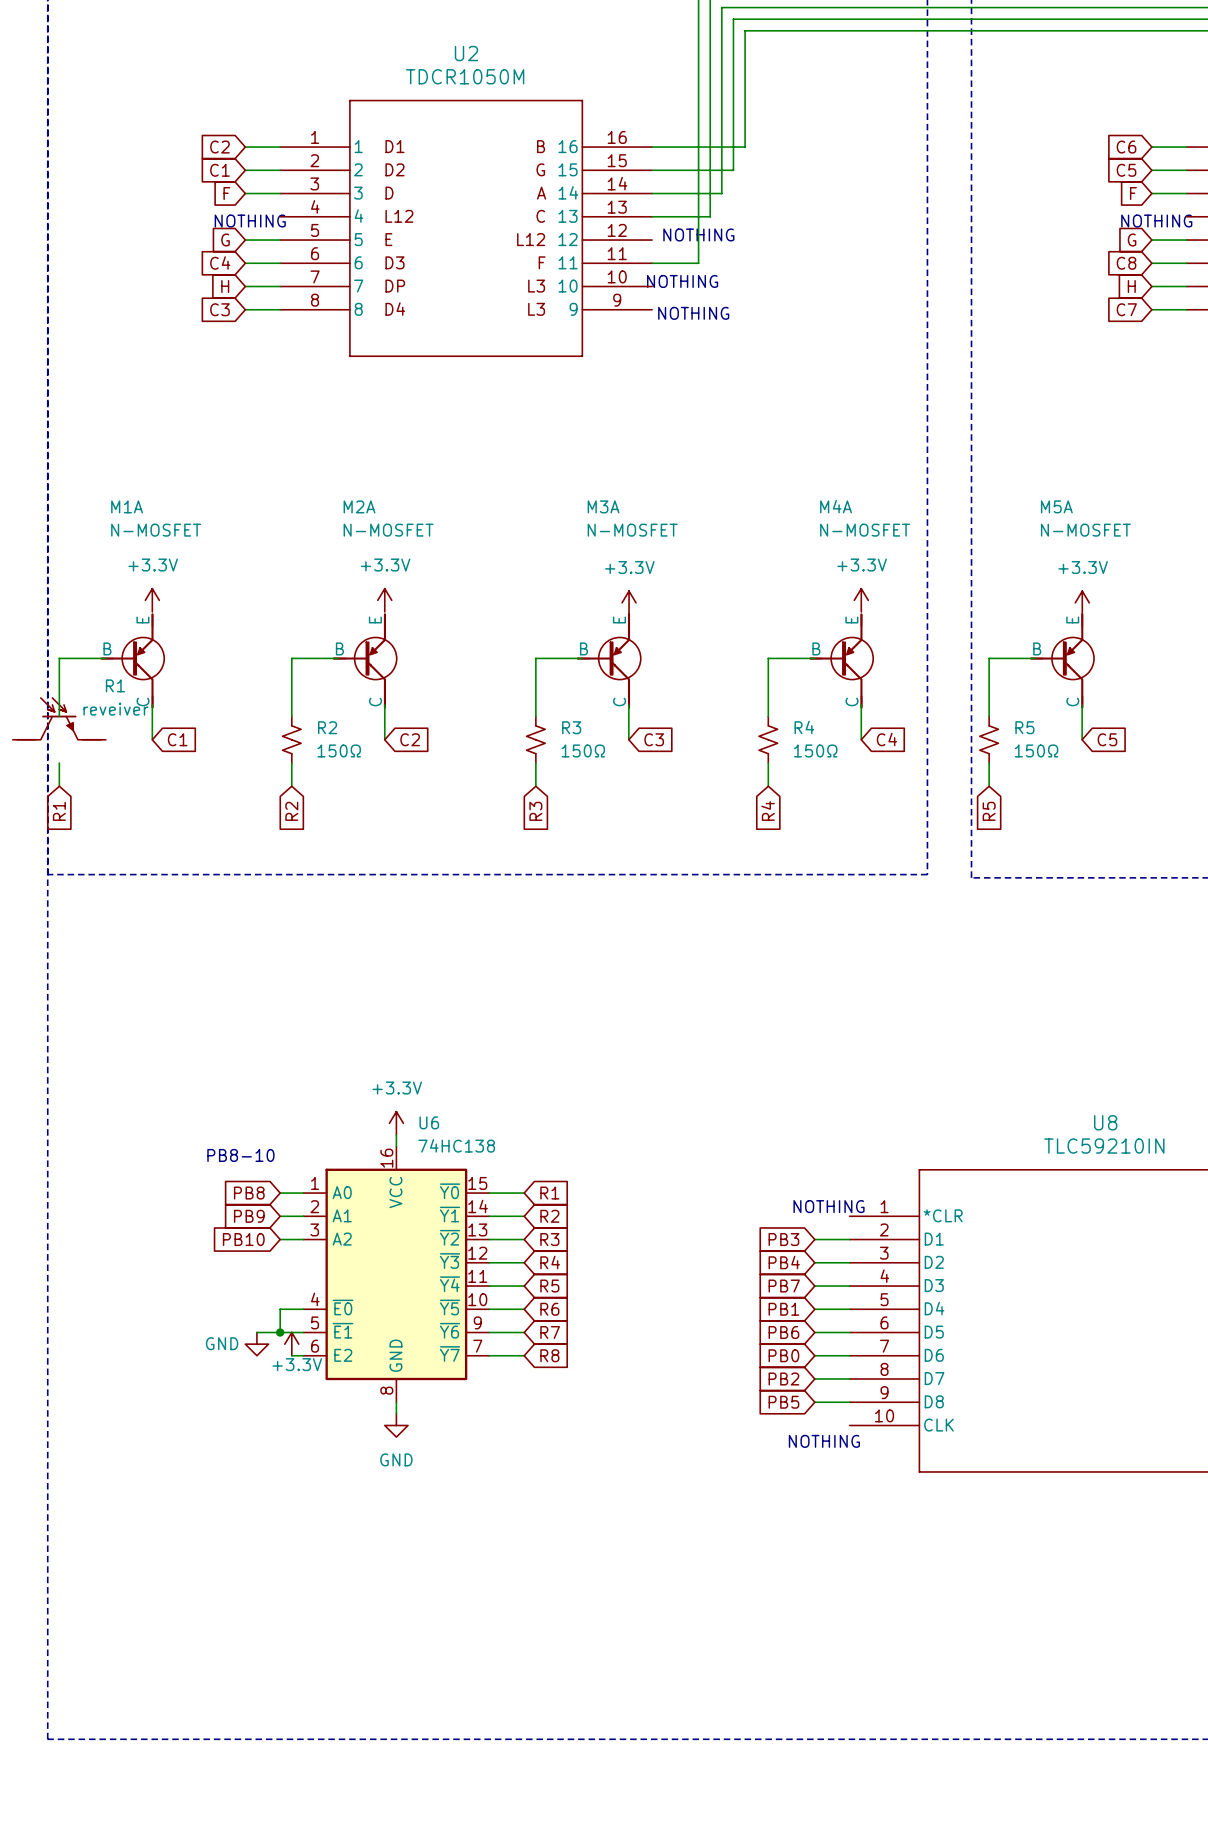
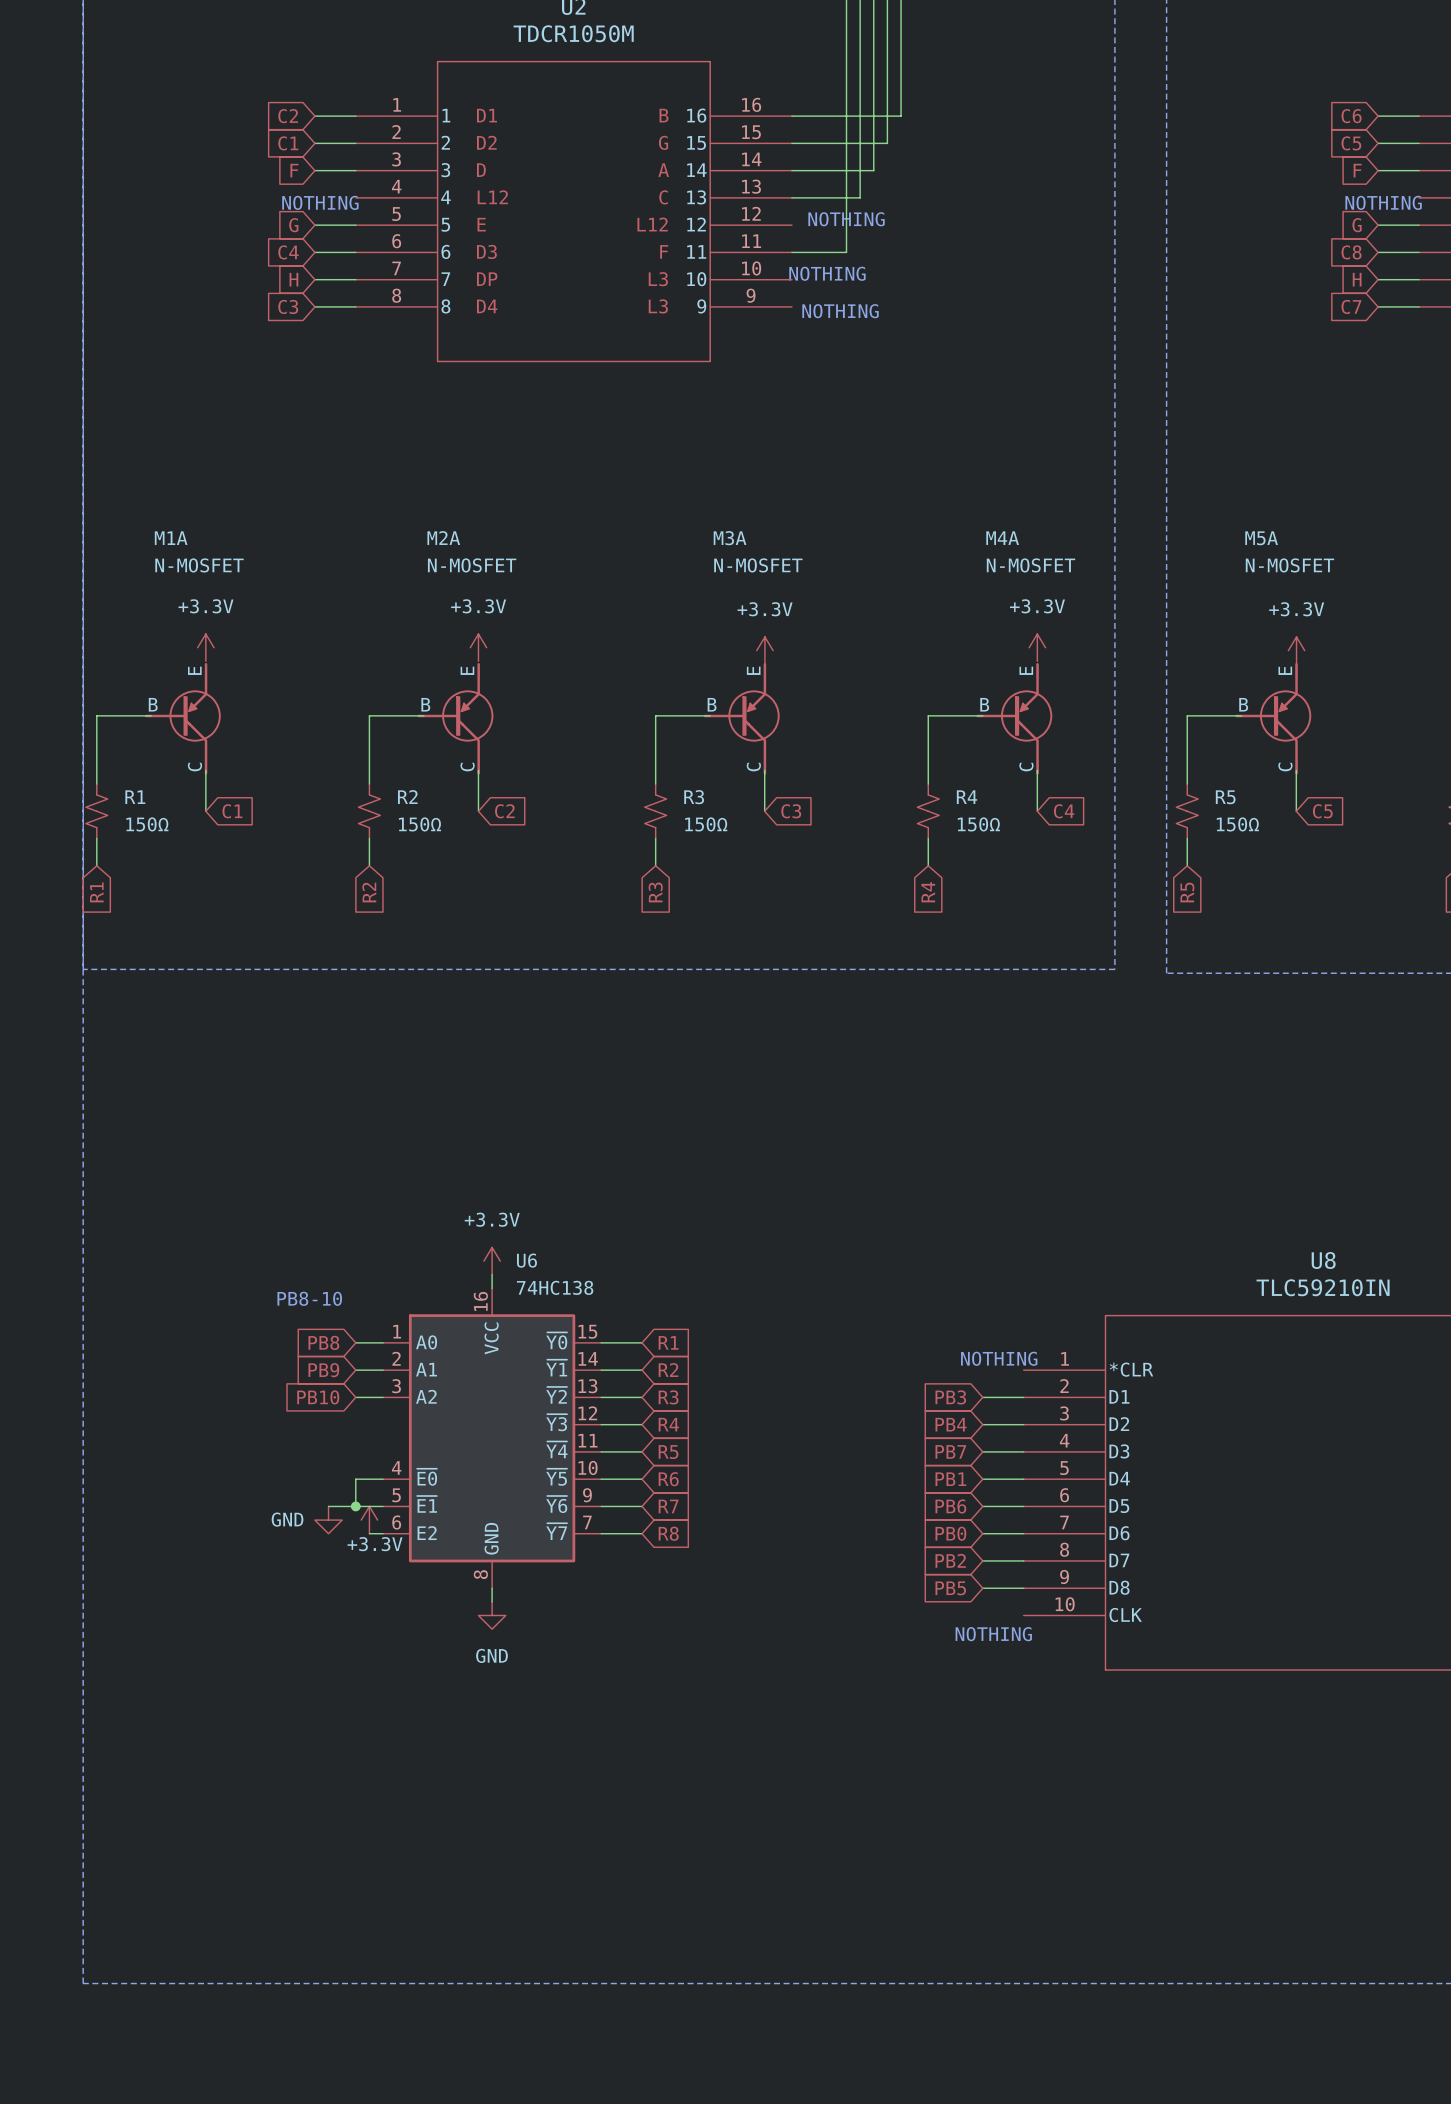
R1 name position: R1 (115, 685) -> R1 (135, 797)
R1 symbol: [12, 697, 106, 740] -> [85, 784, 108, 839]
R1 value: reveiver (115, 709) -> 150Ω (147, 824)

